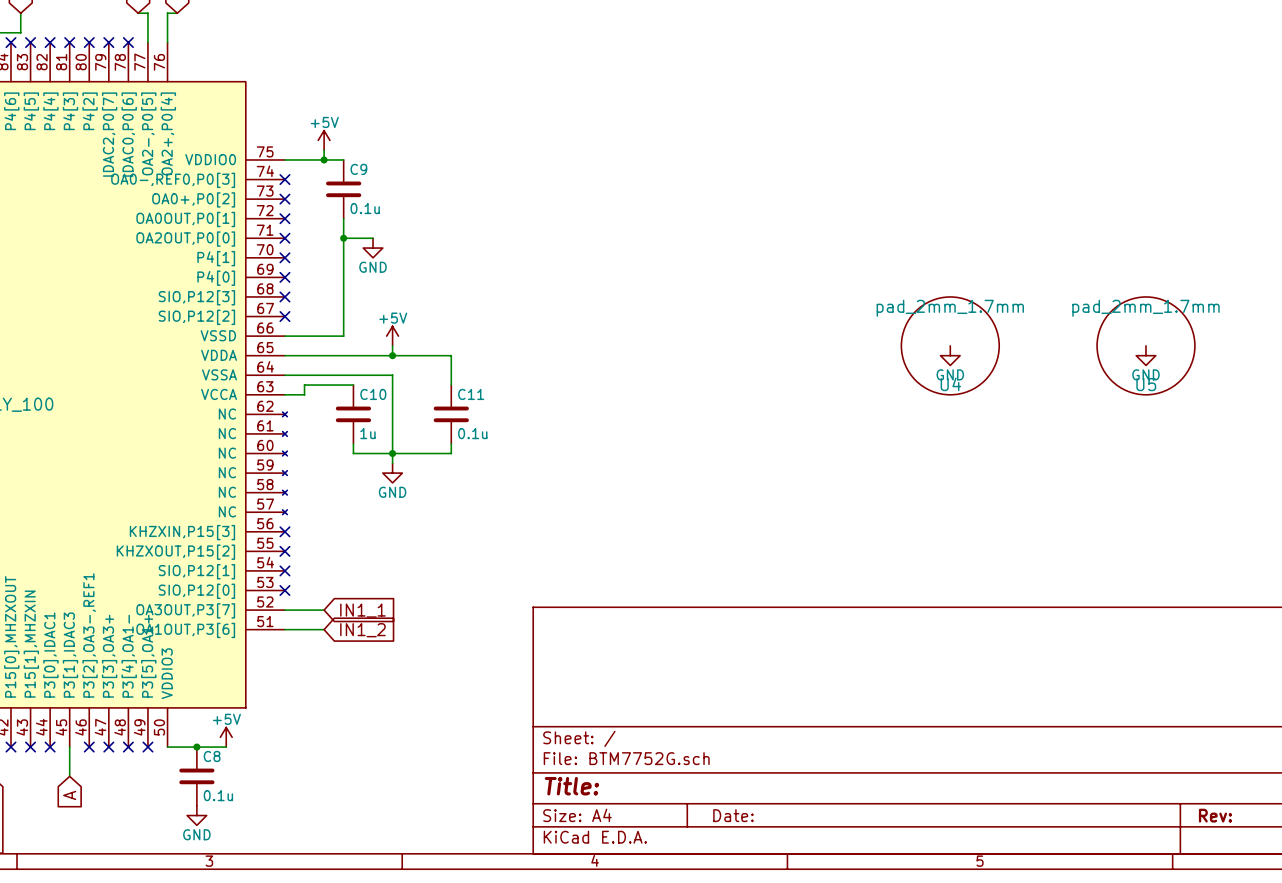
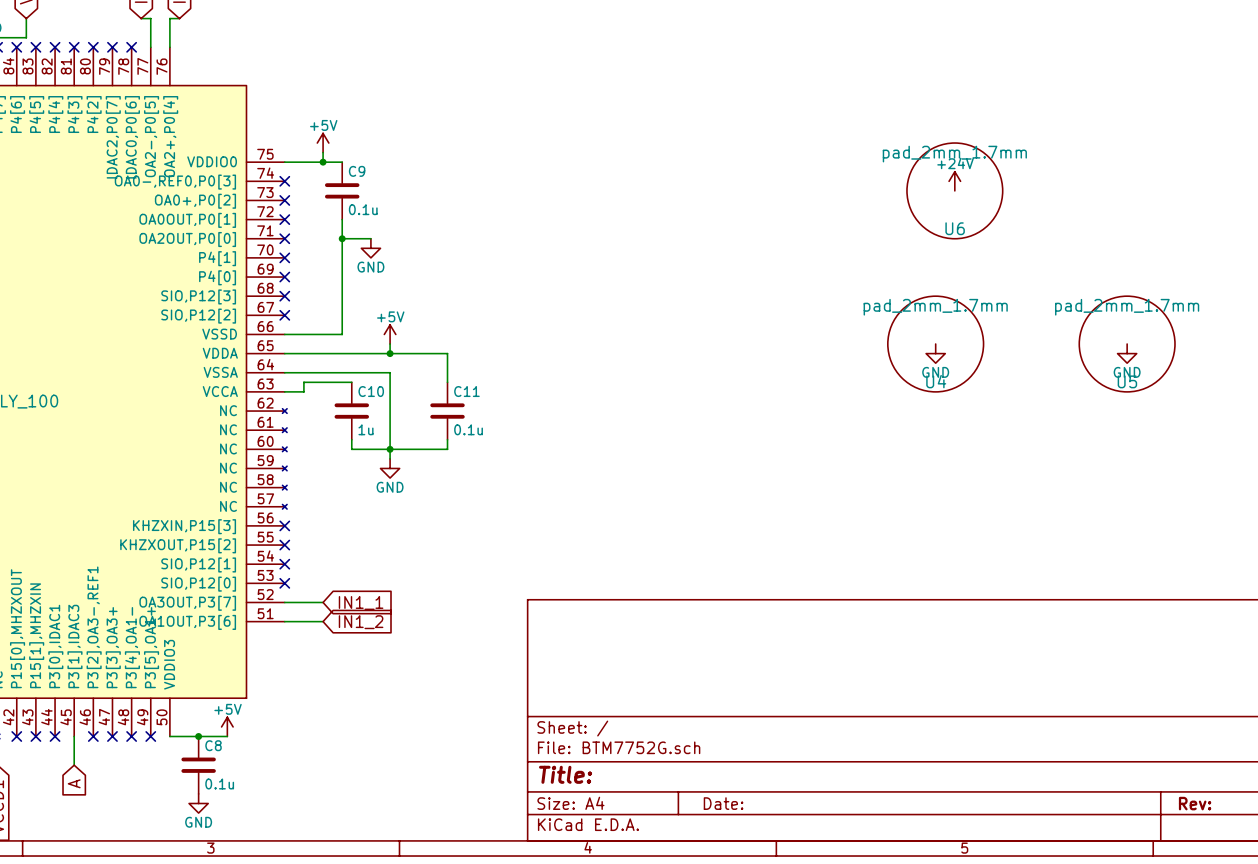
power symbol: none -> +24V (954, 181)
U6: none -> pad_2mm_1.7mm (954, 190)

